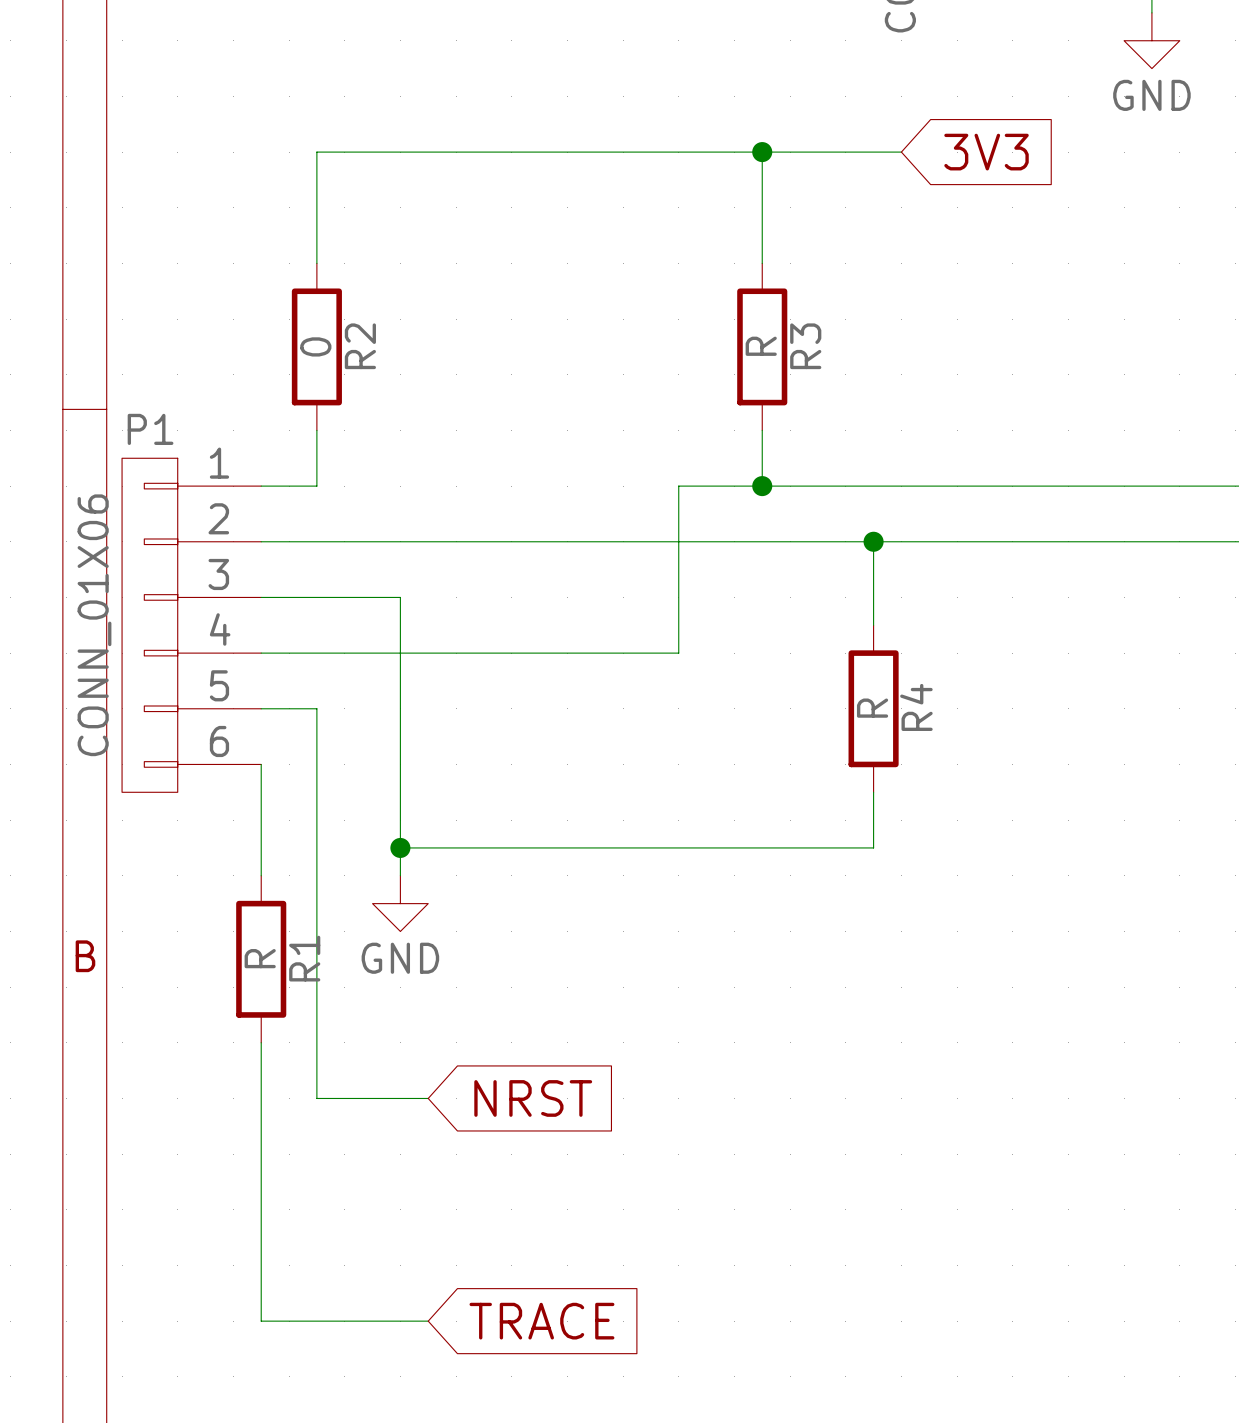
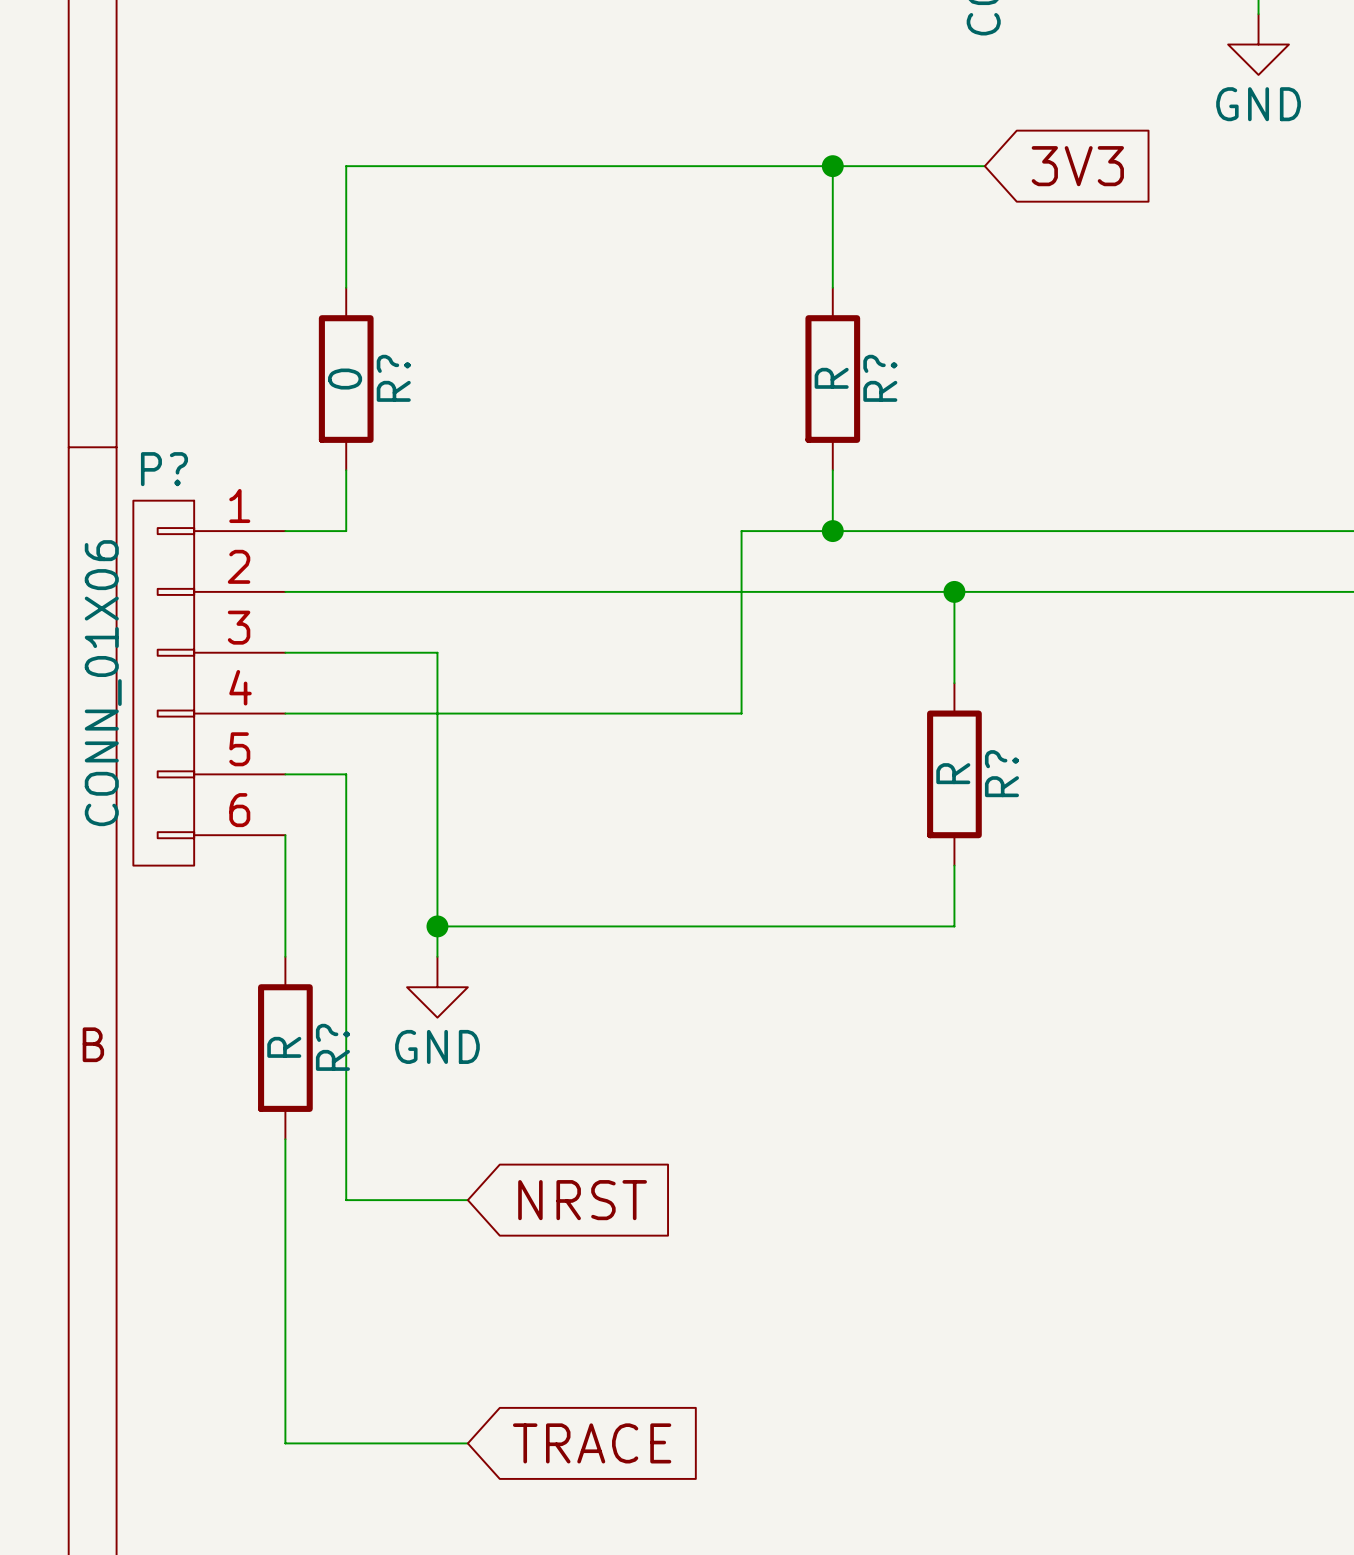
R2 name: R2 (360, 346) -> R? (393, 378)
R3 name: R3 (805, 346) -> R? (880, 378)
P1 name: P1 (150, 429) -> P? (164, 469)
R4 name: R4 (916, 707) -> R? (1001, 773)
R1 name: R1 (304, 958) -> R? (332, 1047)

